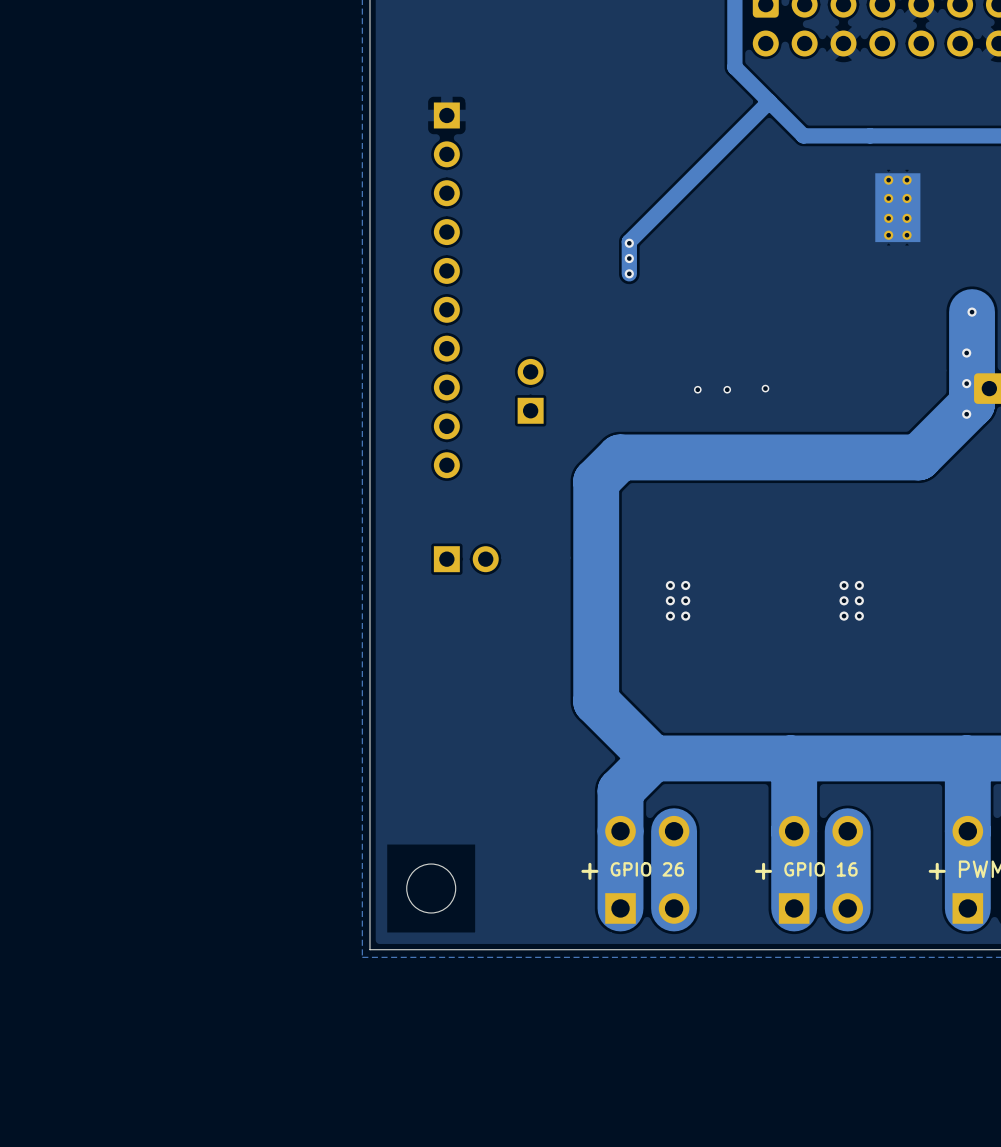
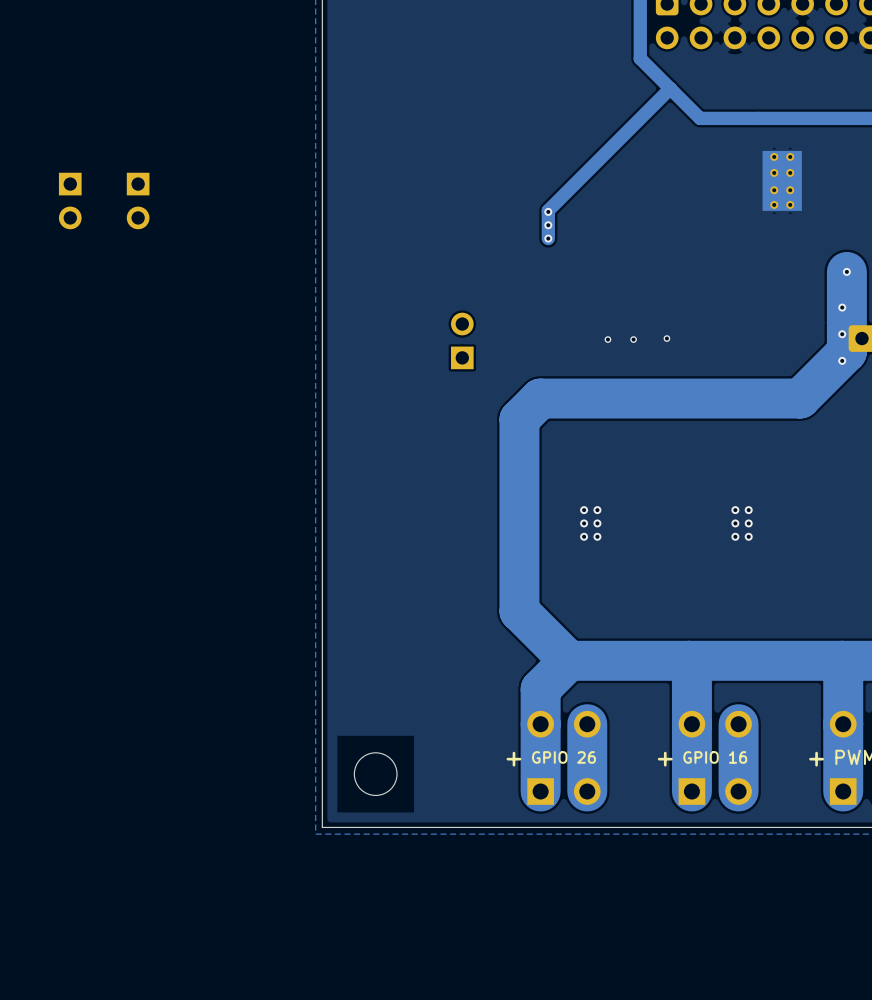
part: none -> (70, 200)
part: none -> (138, 200)
part: (446, 290) -> none
part: (466, 559) -> none

